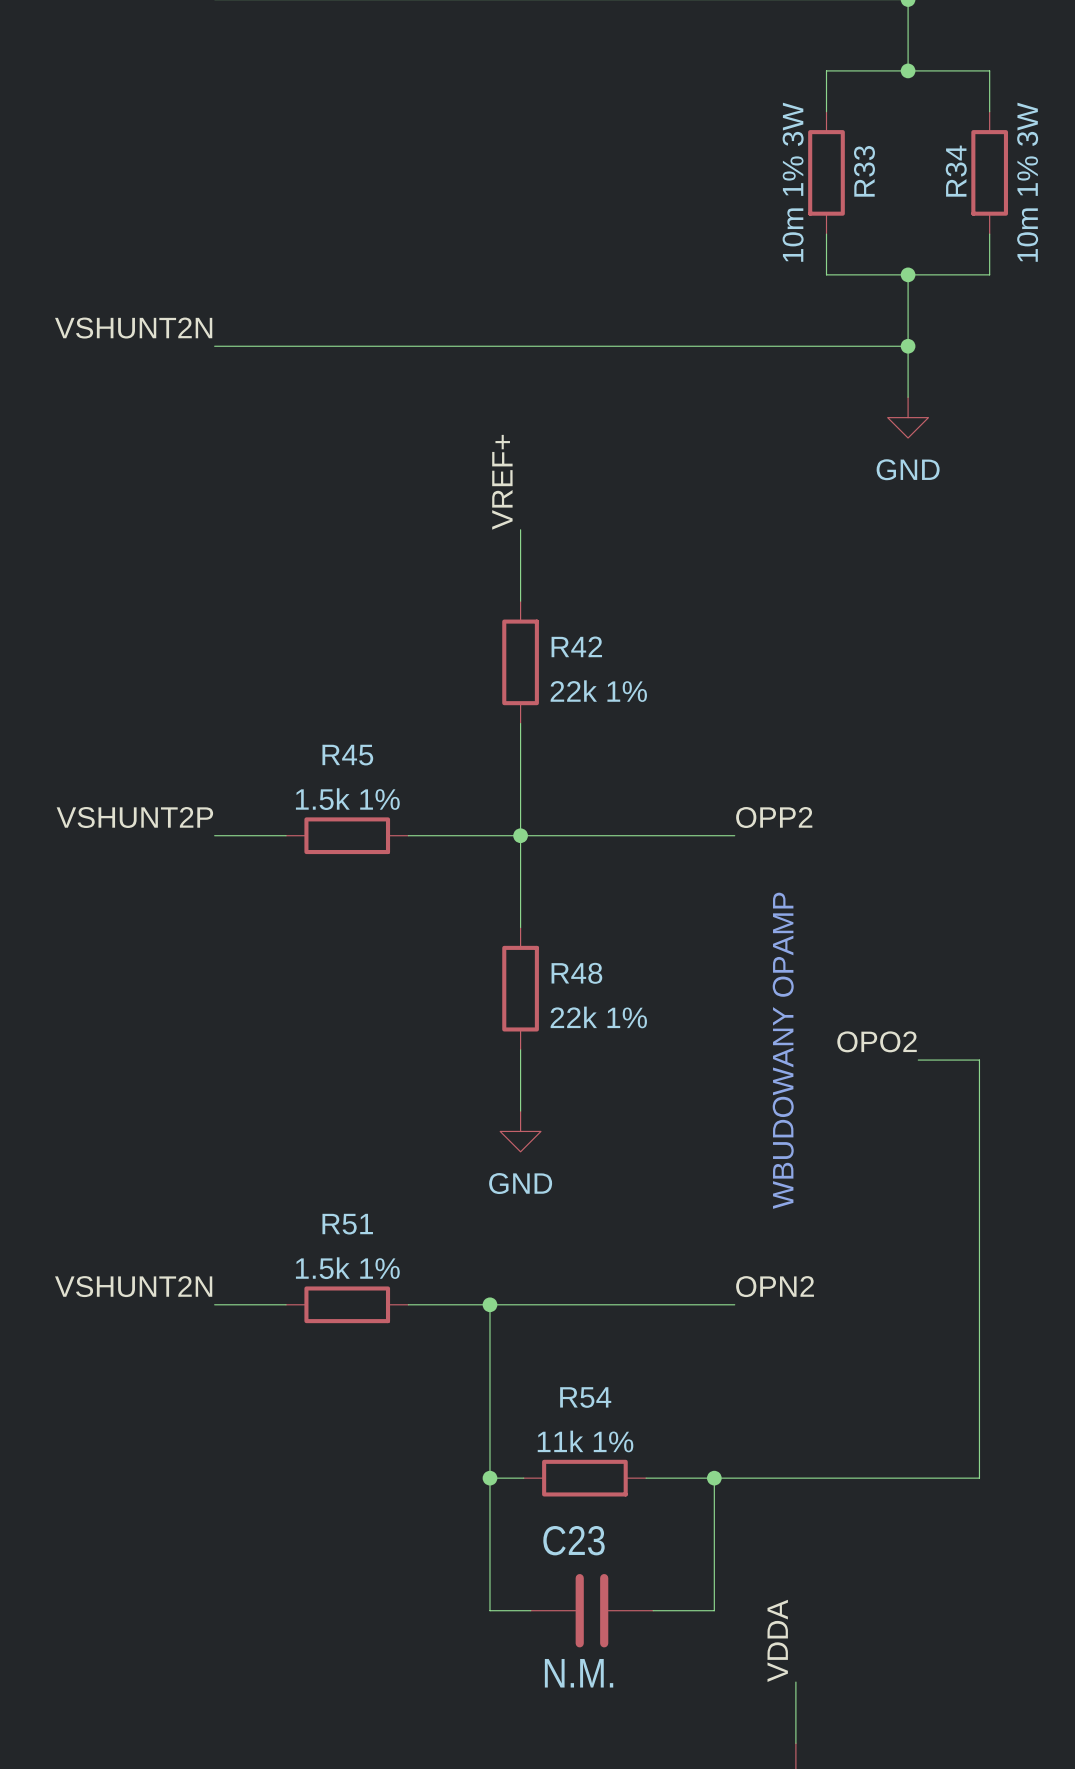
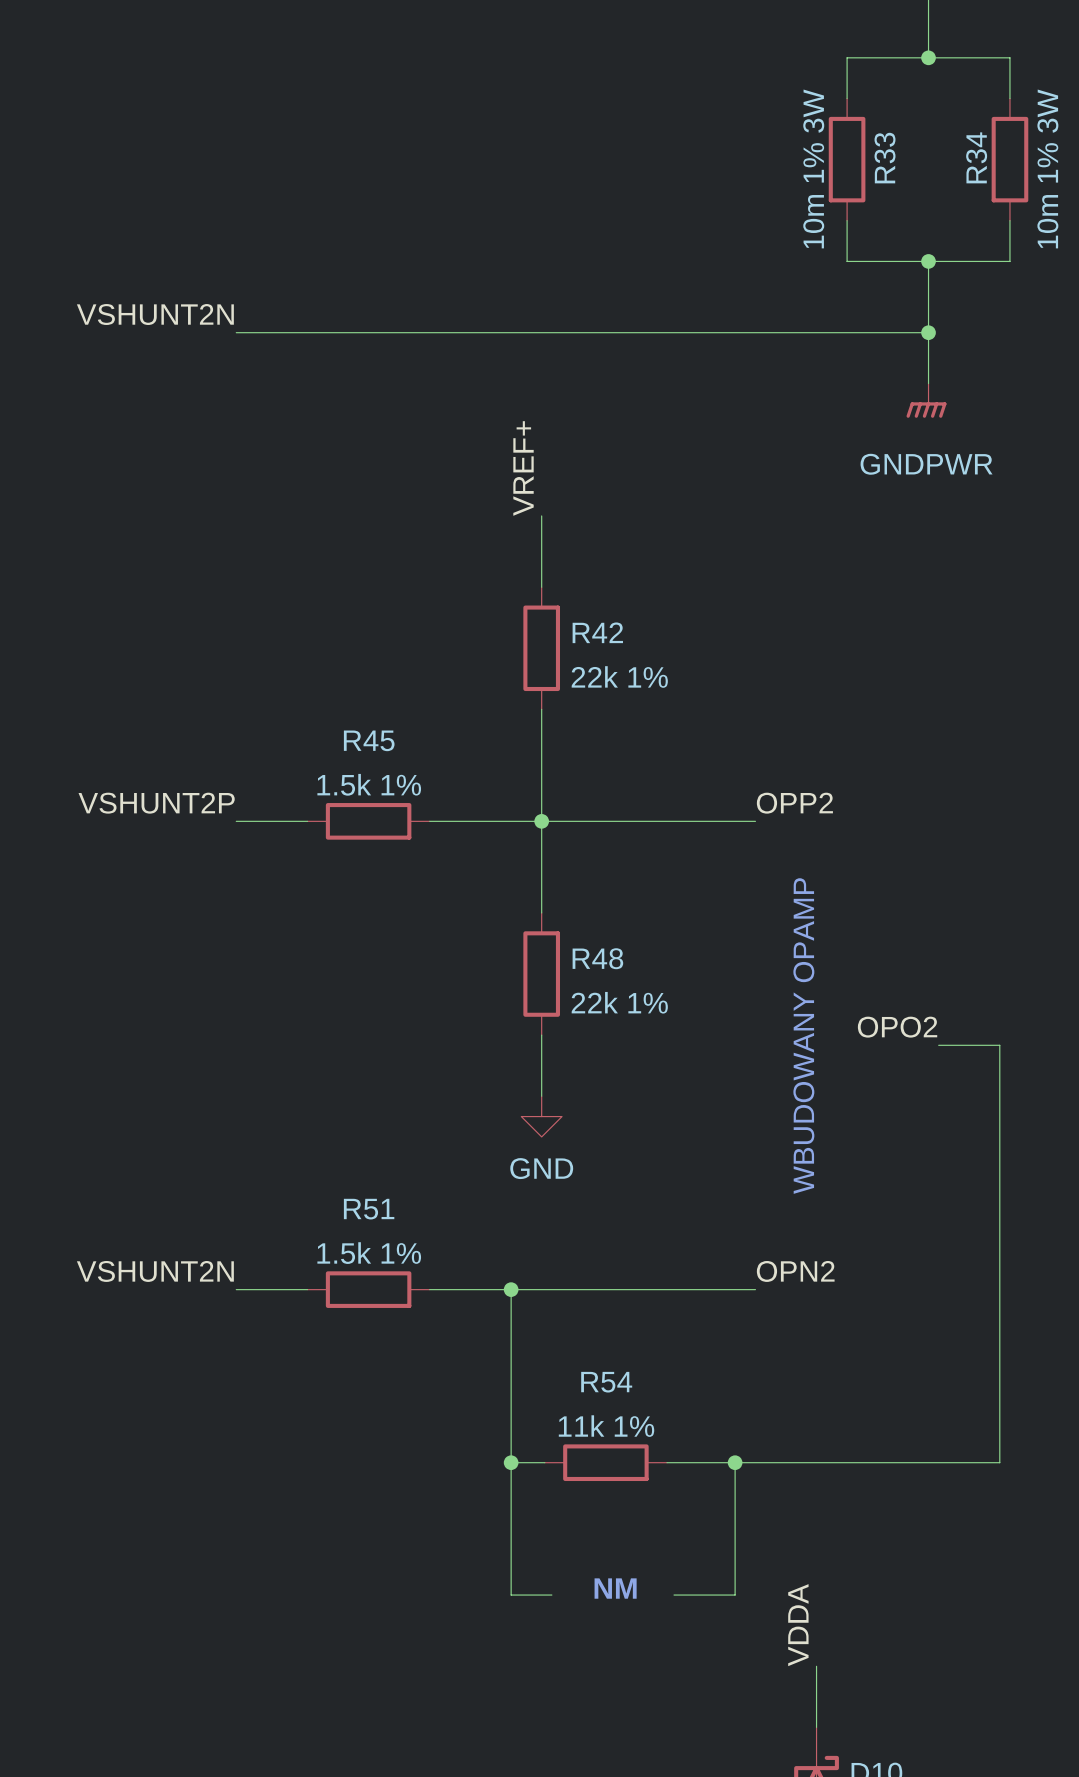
power symbol: GND (908, 417) -> GNDPWR (926, 400)
text: none -> NM (615, 1588)
C23: N.M. (591, 1610) -> none

